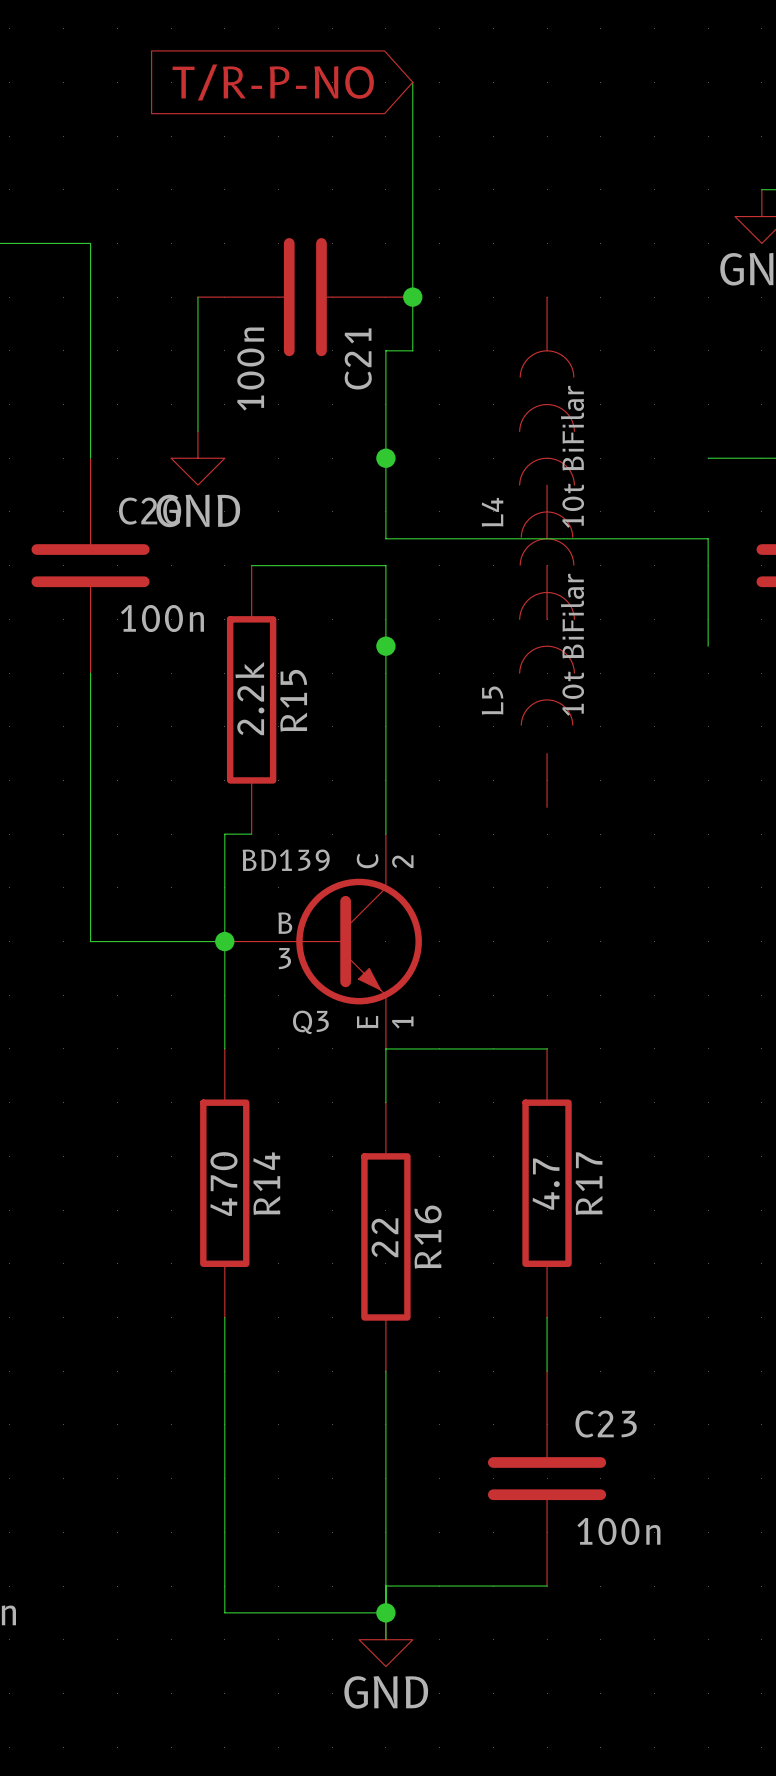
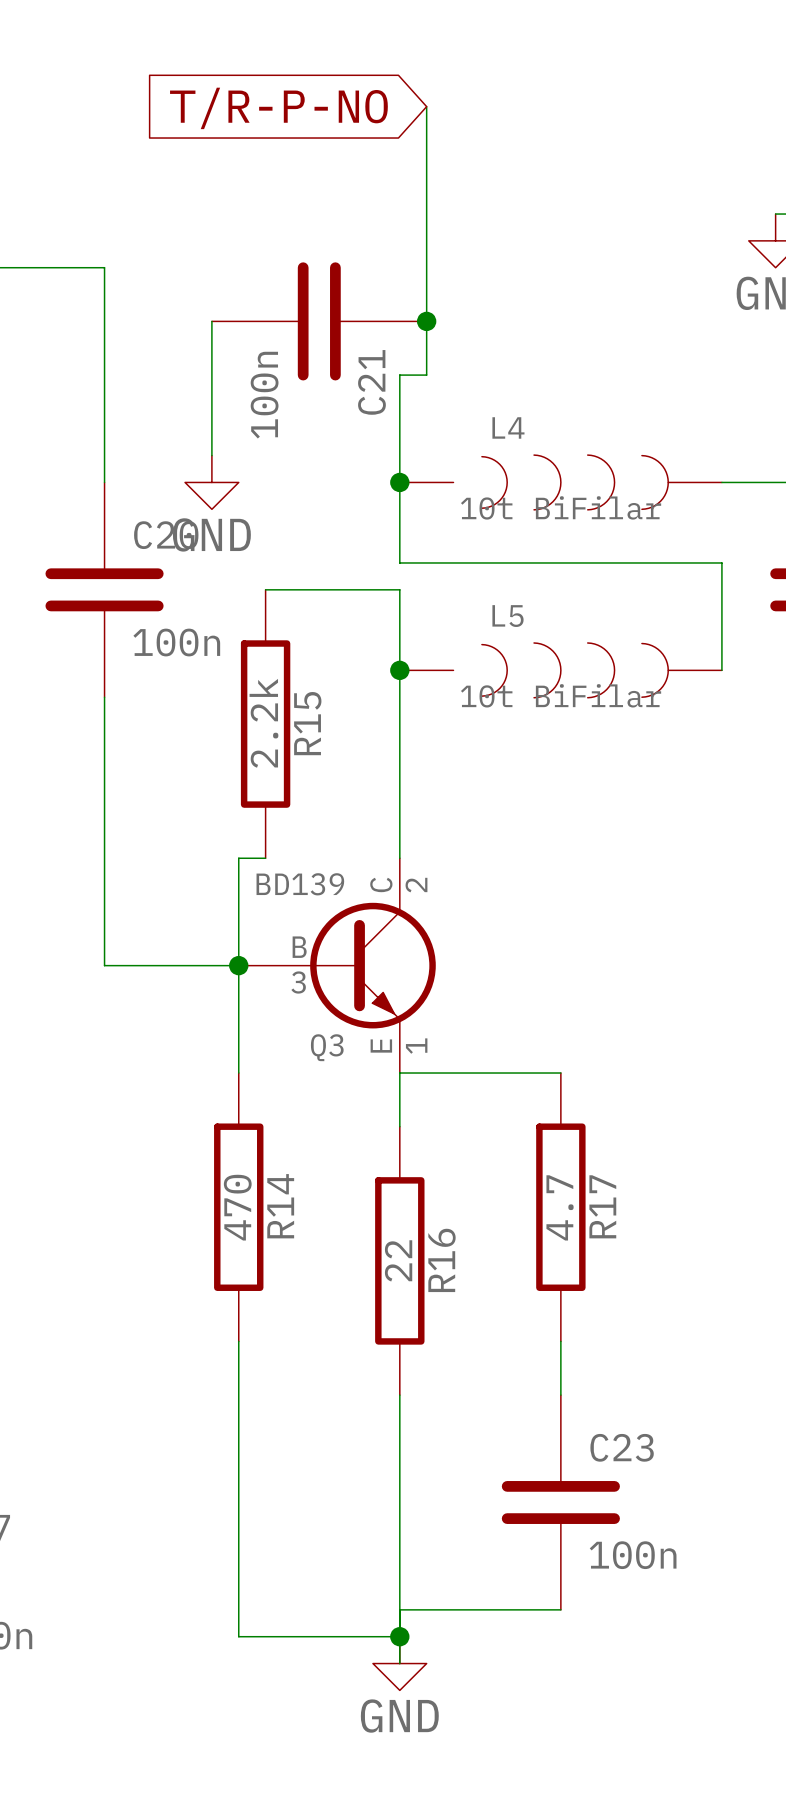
L4 rotation: 0° (547, 444) -> 90° clockwise (575, 482)
L5 rotation: 0° (547, 631) -> 90° clockwise (575, 670)

